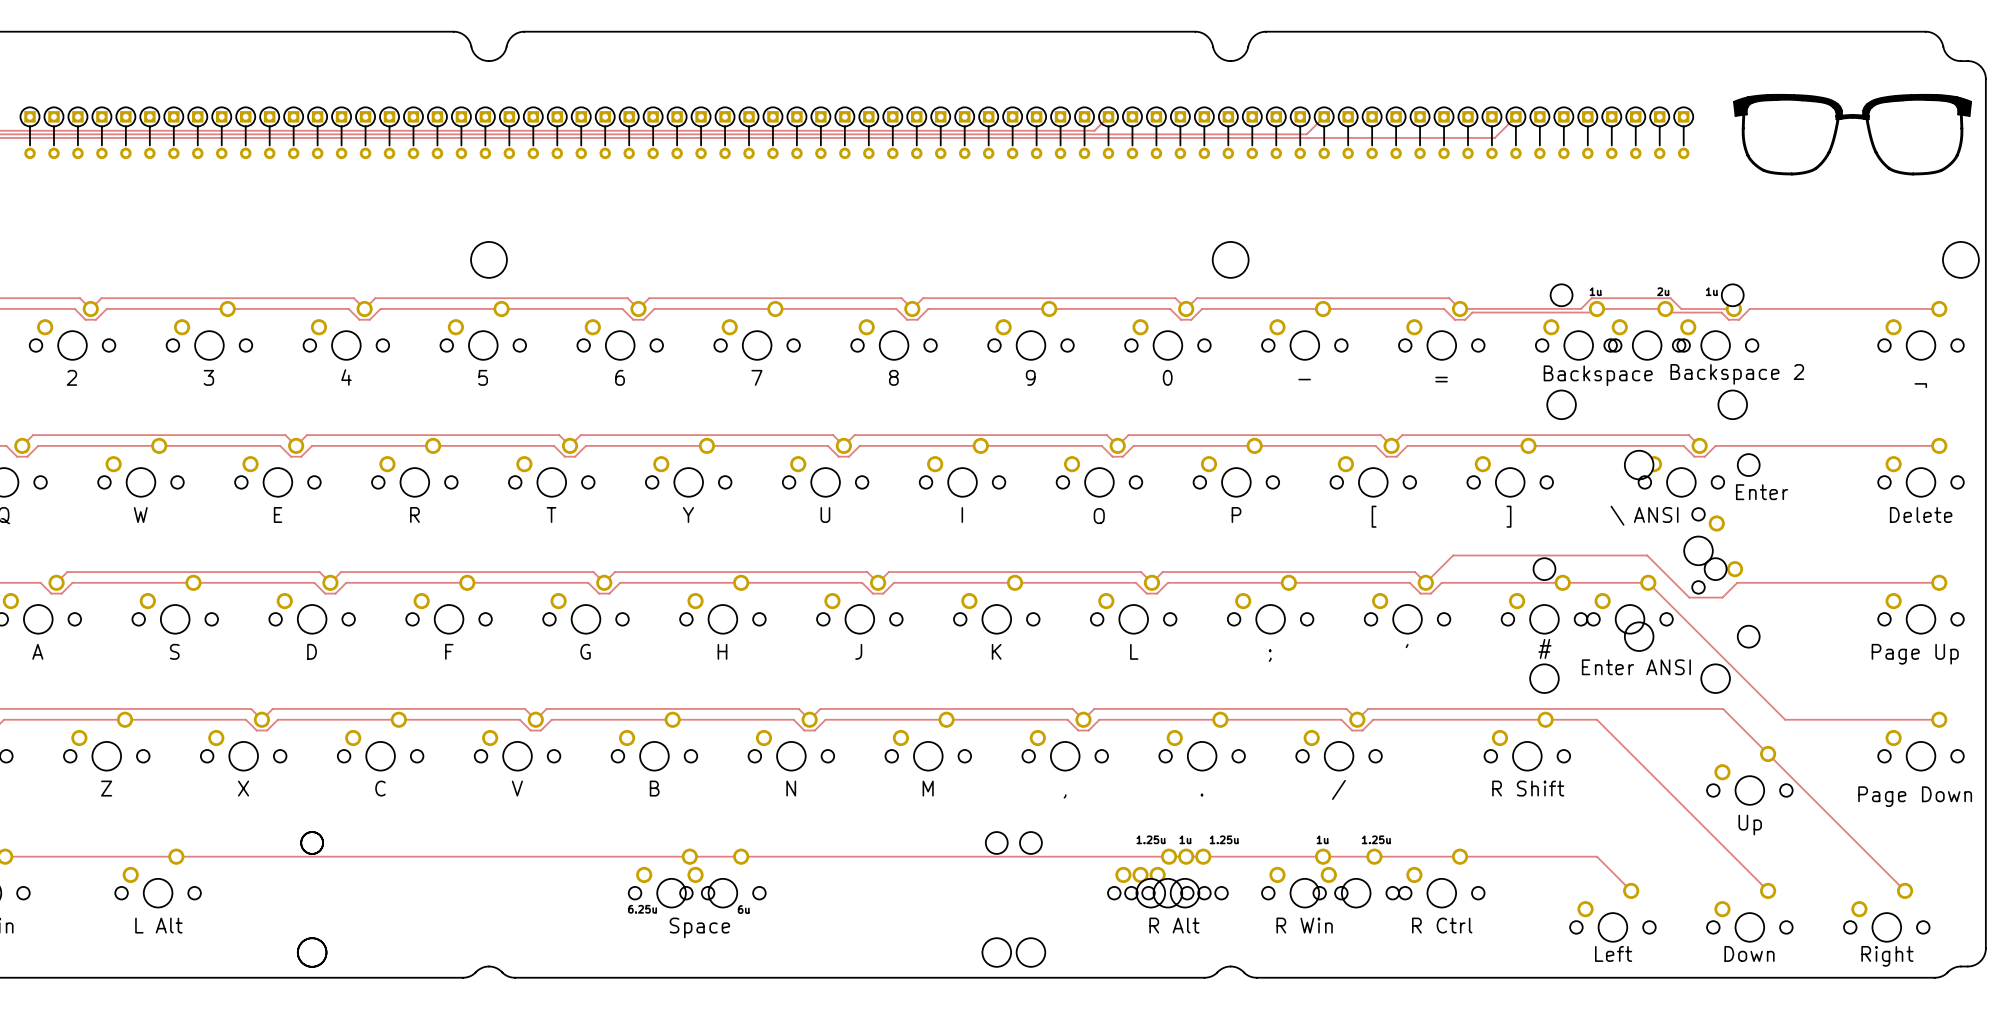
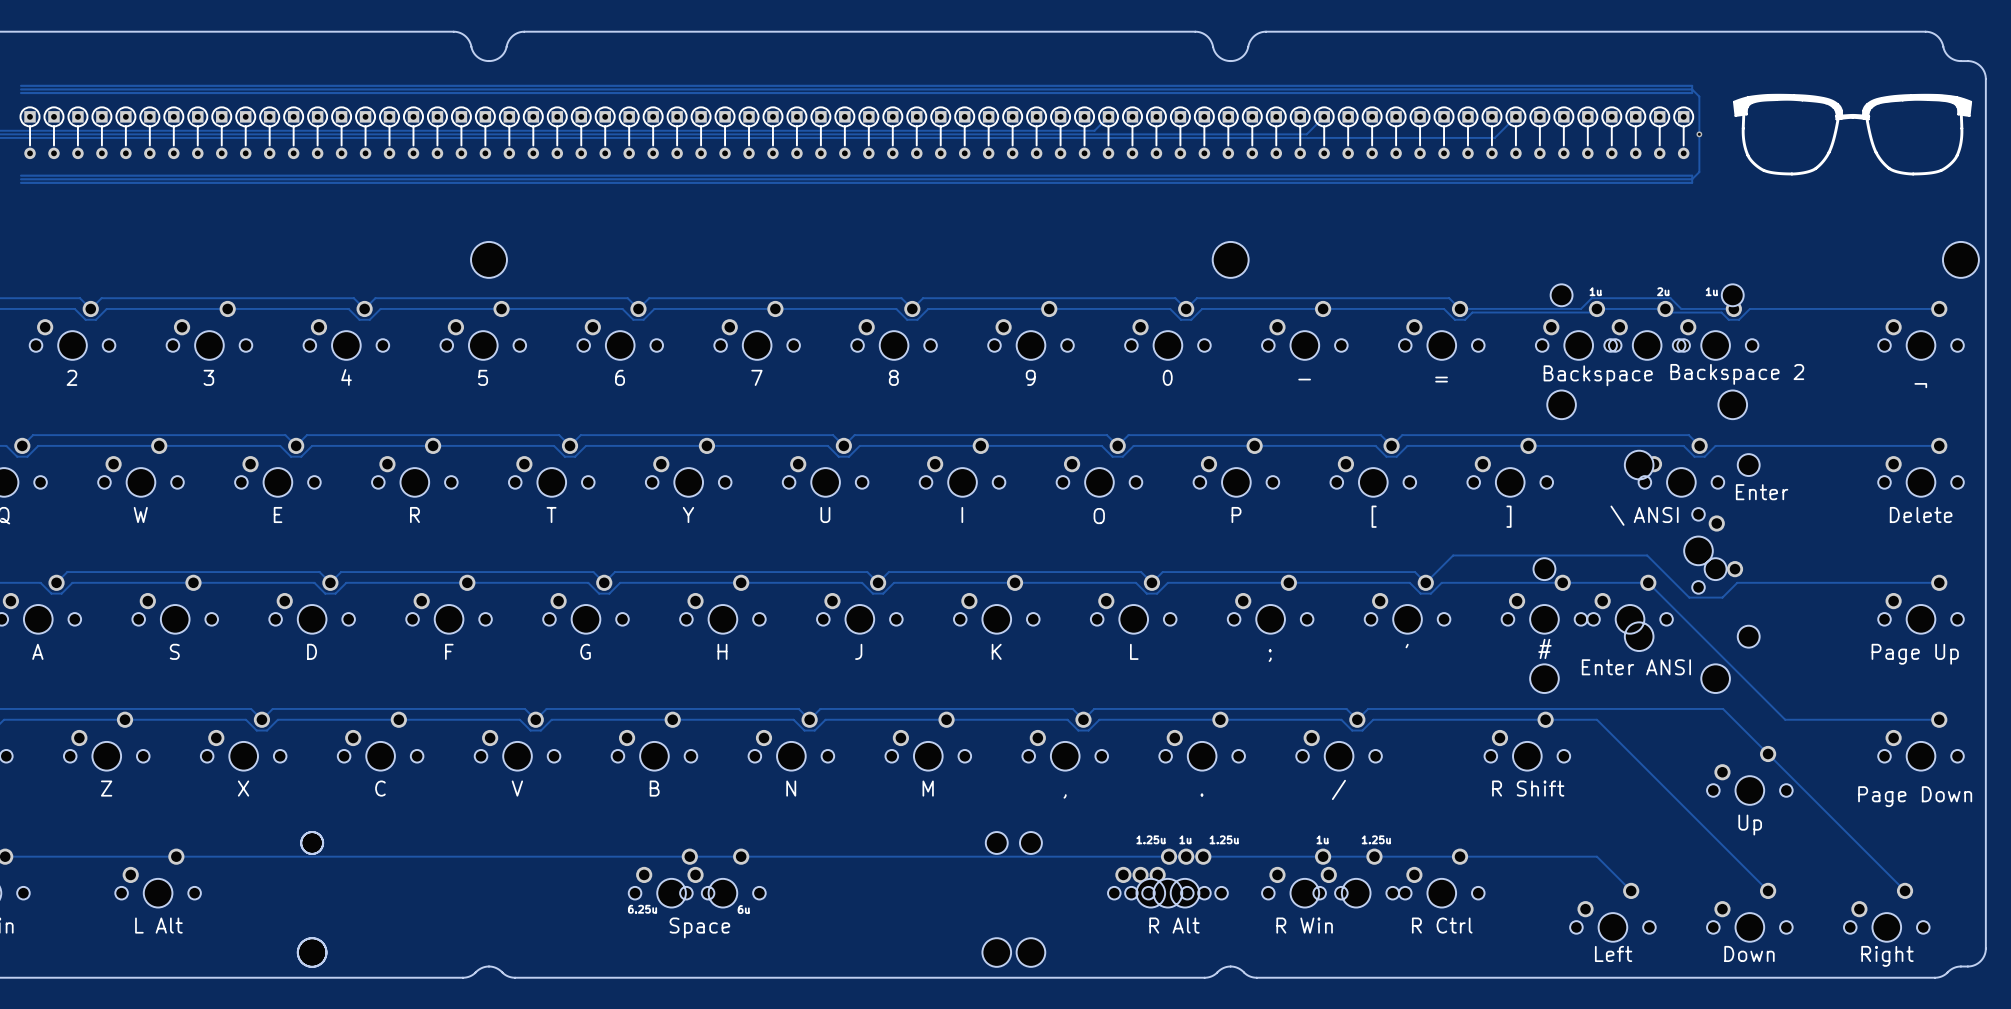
track: none -> (21, 85) (1692, 85) (1692, 93) (21, 93)
track: none -> (21, 89) (1692, 89) (1699, 96) (1699, 172) (1692, 179) (21, 179)
via: none -> (1699, 134)
track: none -> (21, 175) (1692, 175) (1692, 182) (21, 182)

